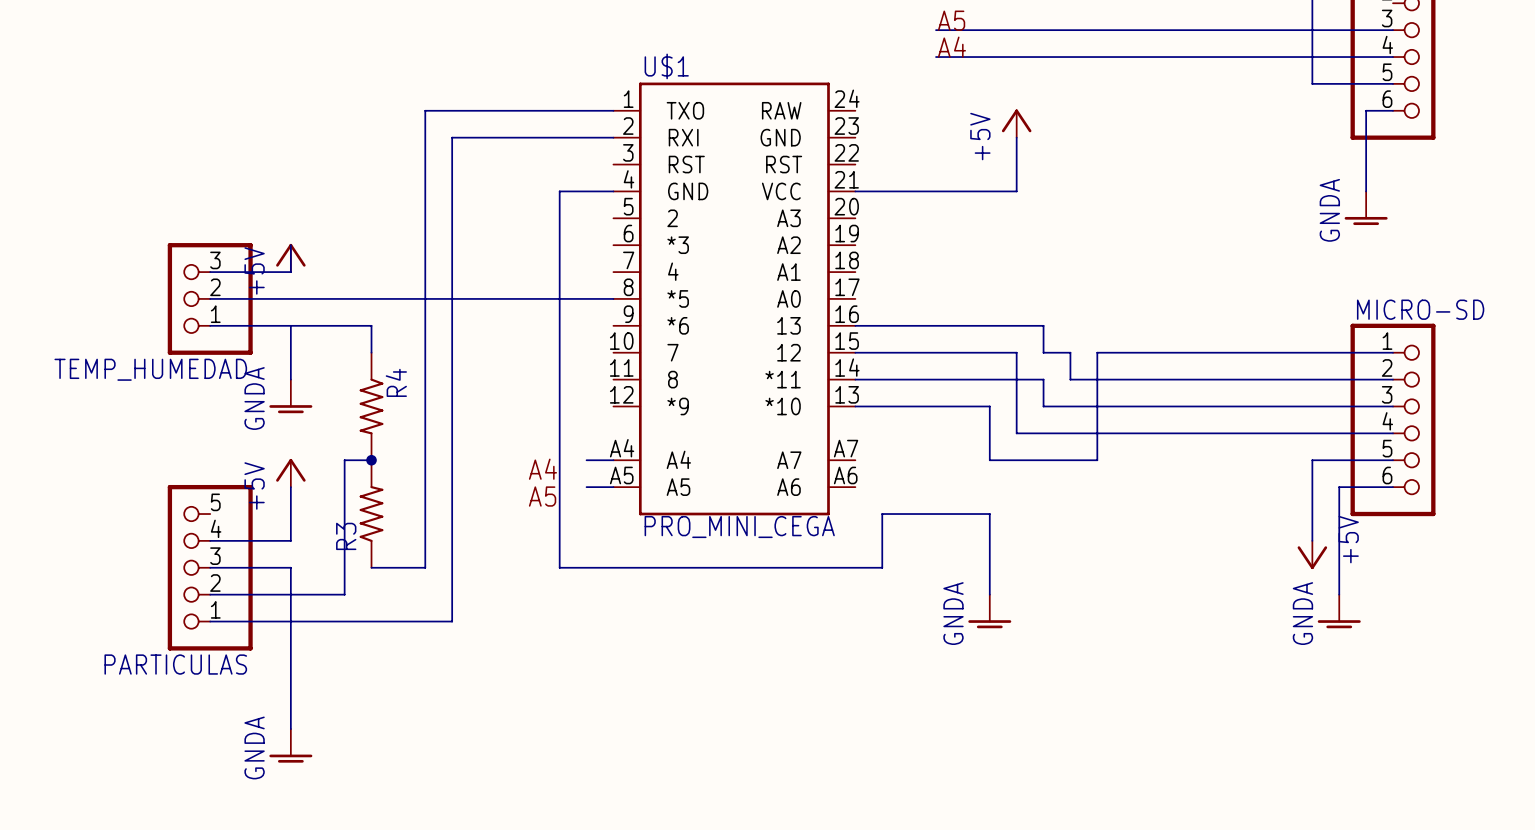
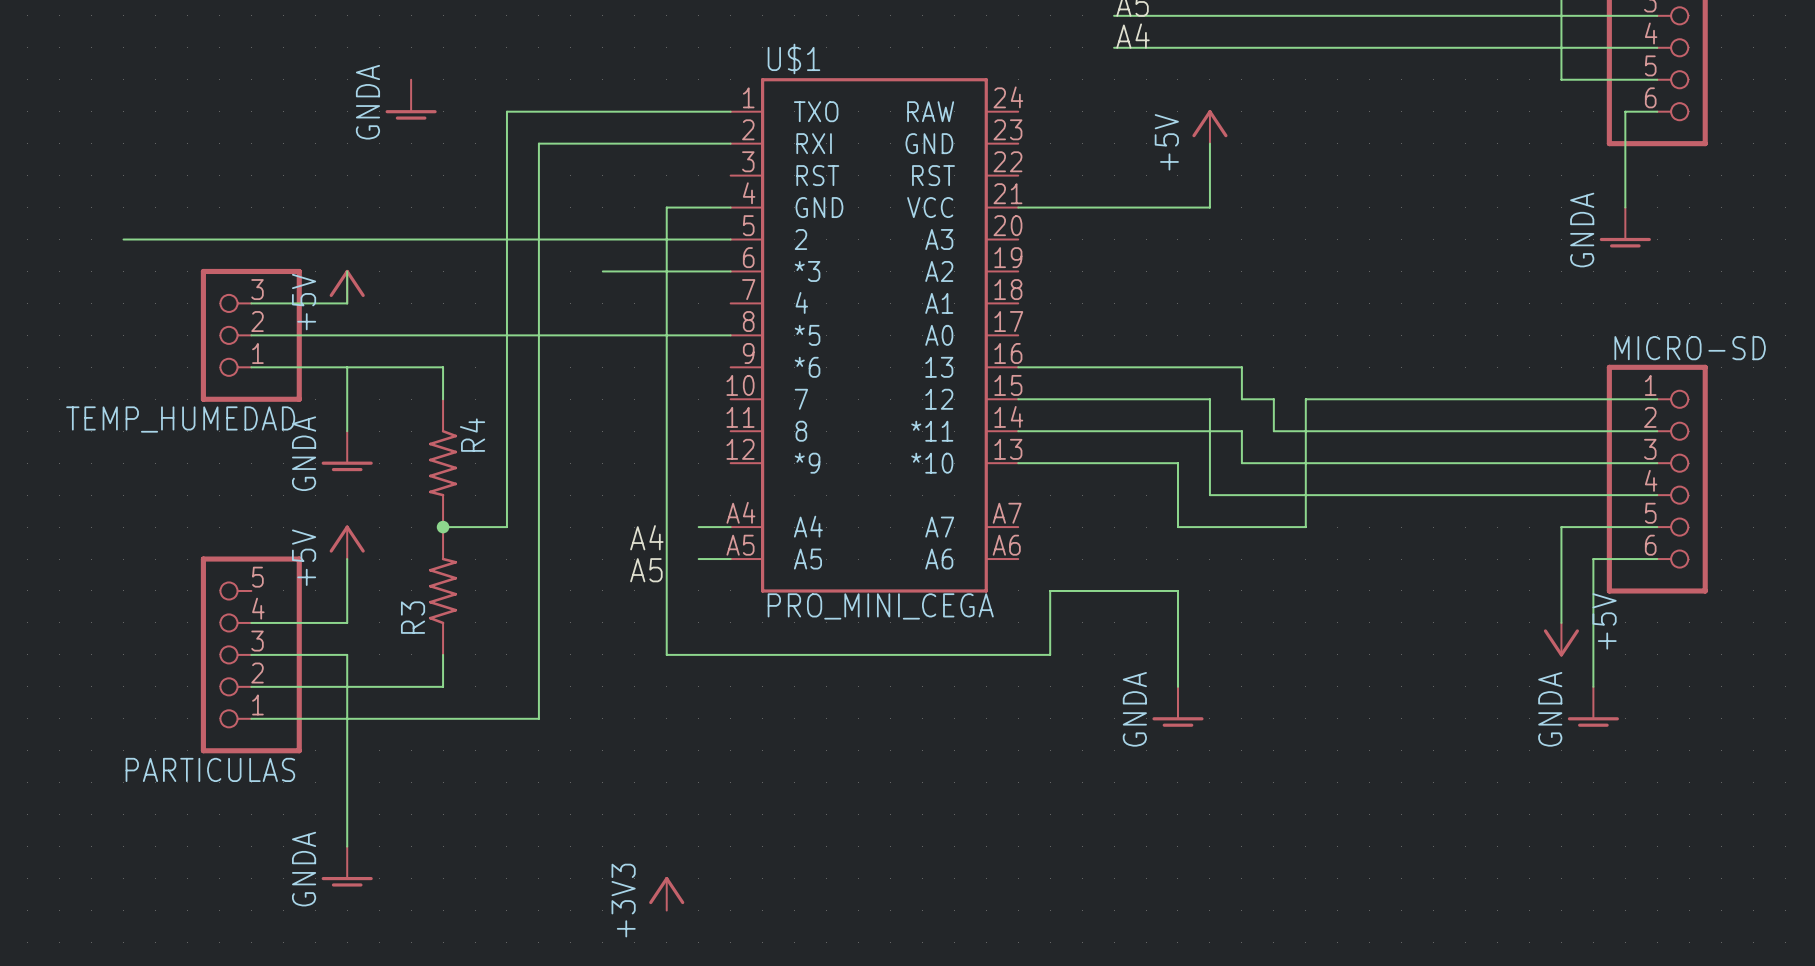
power symbol: none -> GNDA (411, 99)
wire: none -> (123, 239) (730, 239)
wire: none -> (602, 271) (730, 271)
wire: (371, 460) (344, 460) (344, 594) -> (443, 654) (443, 686) (411, 686)
wire: (425, 460) (425, 567) (371, 567) -> (506, 527) (443, 527)
power symbol: none -> +3V3 (666, 893)

